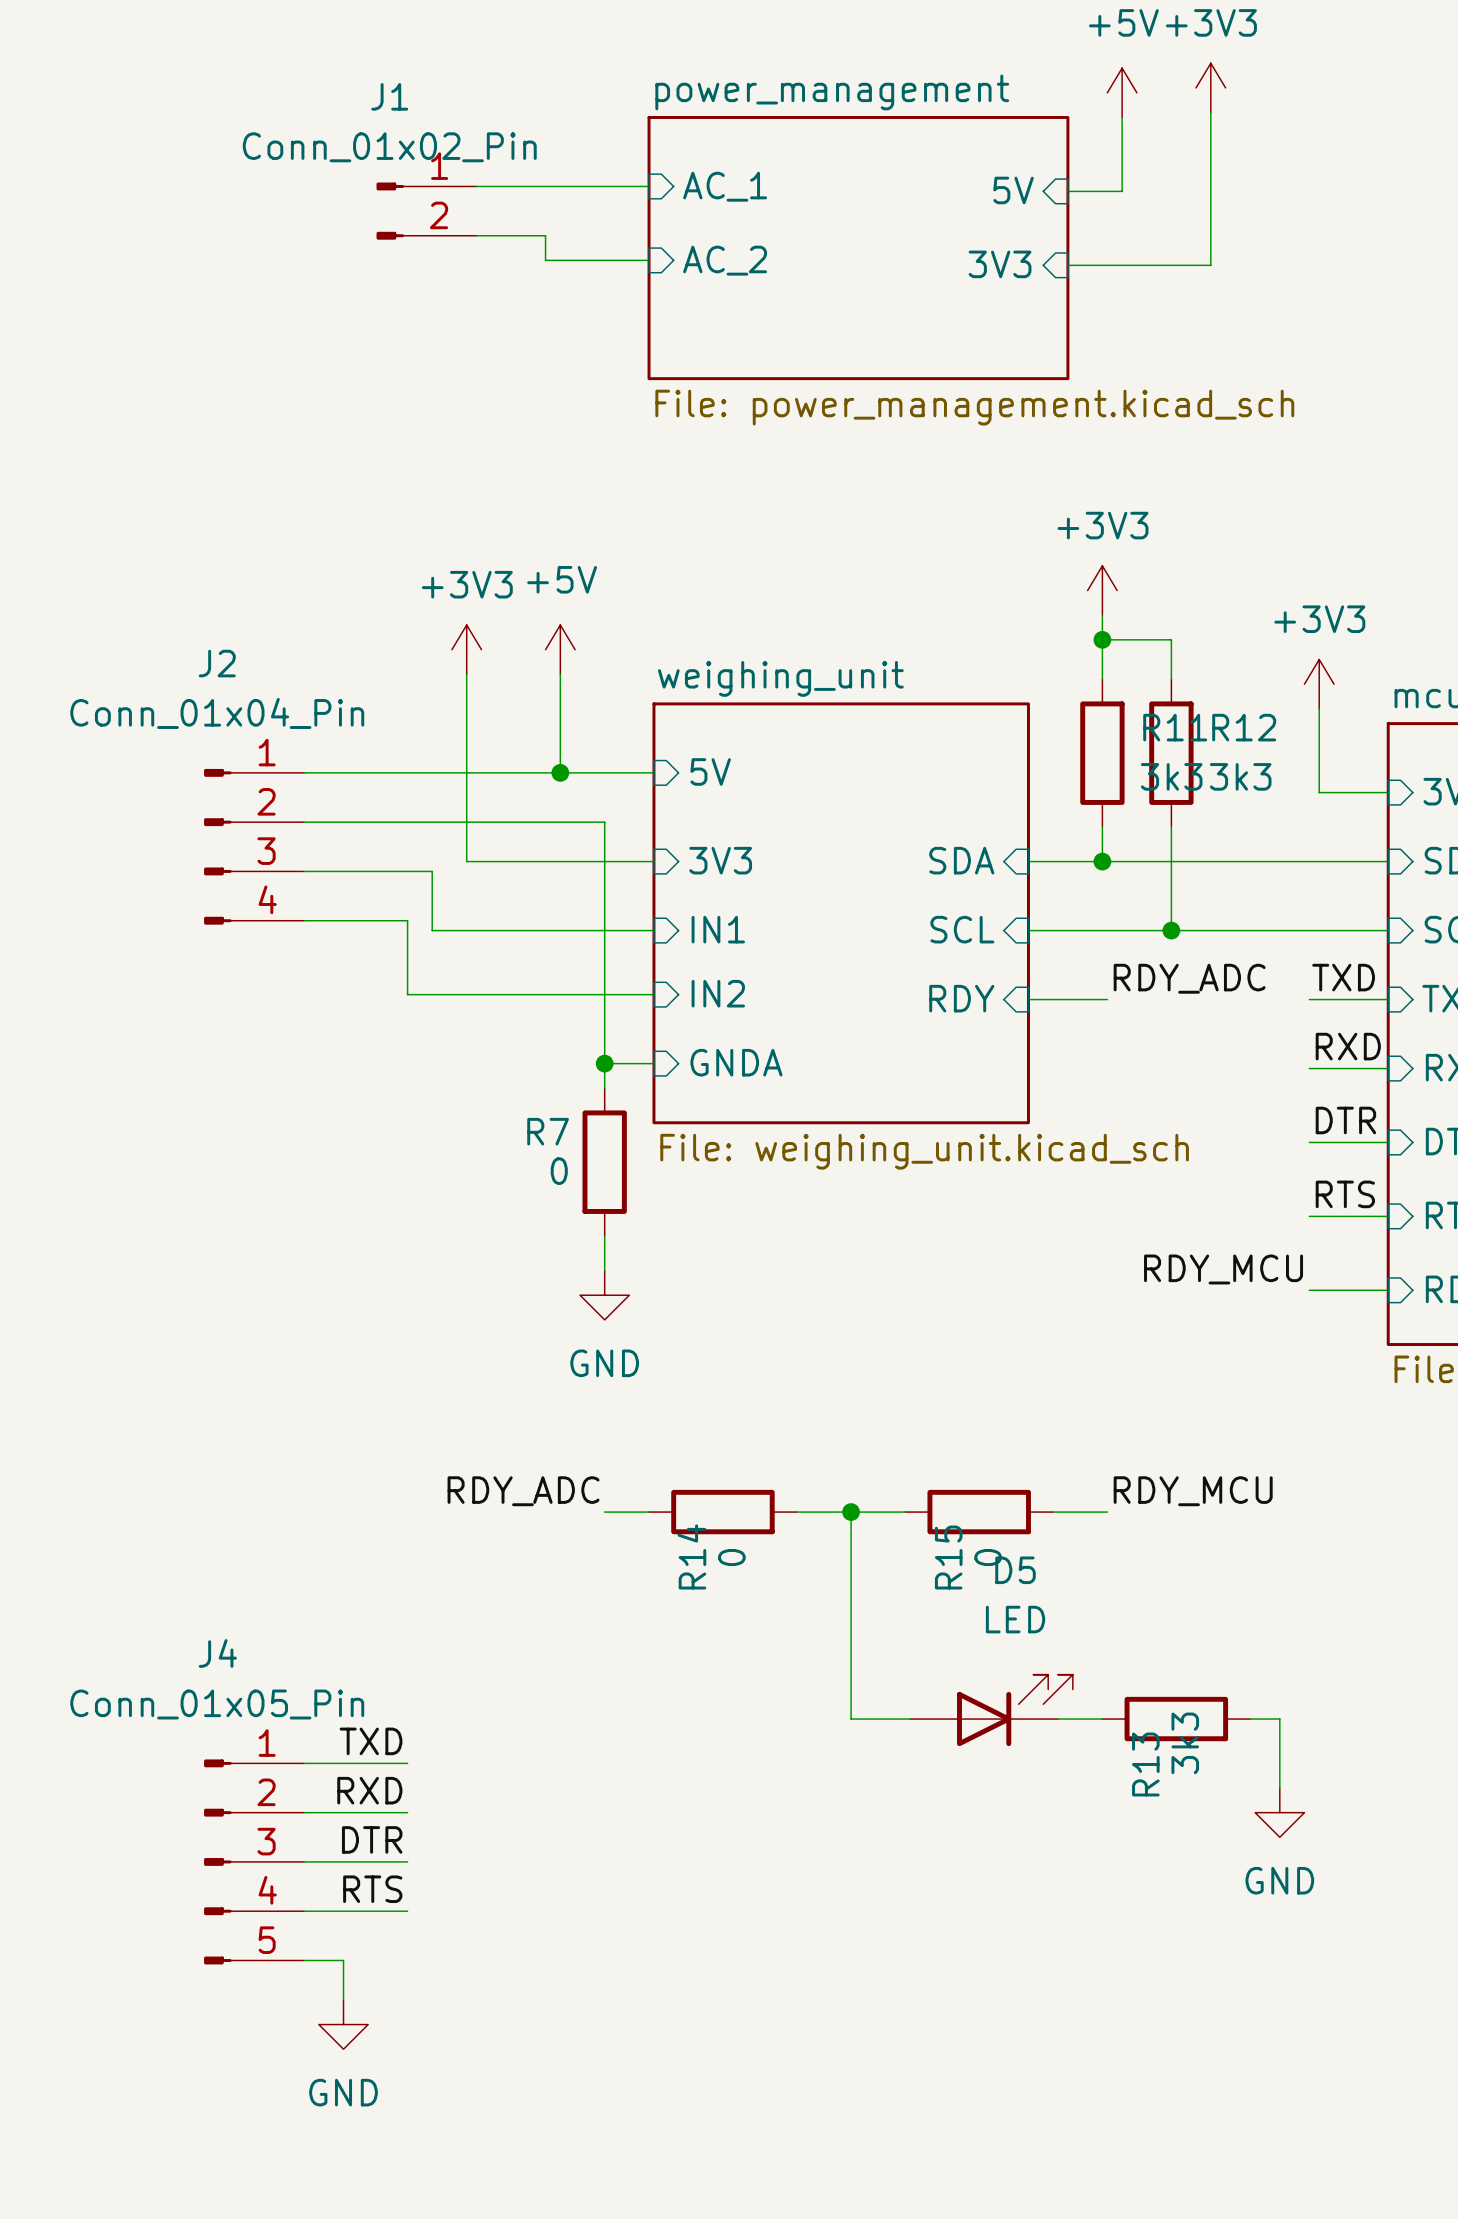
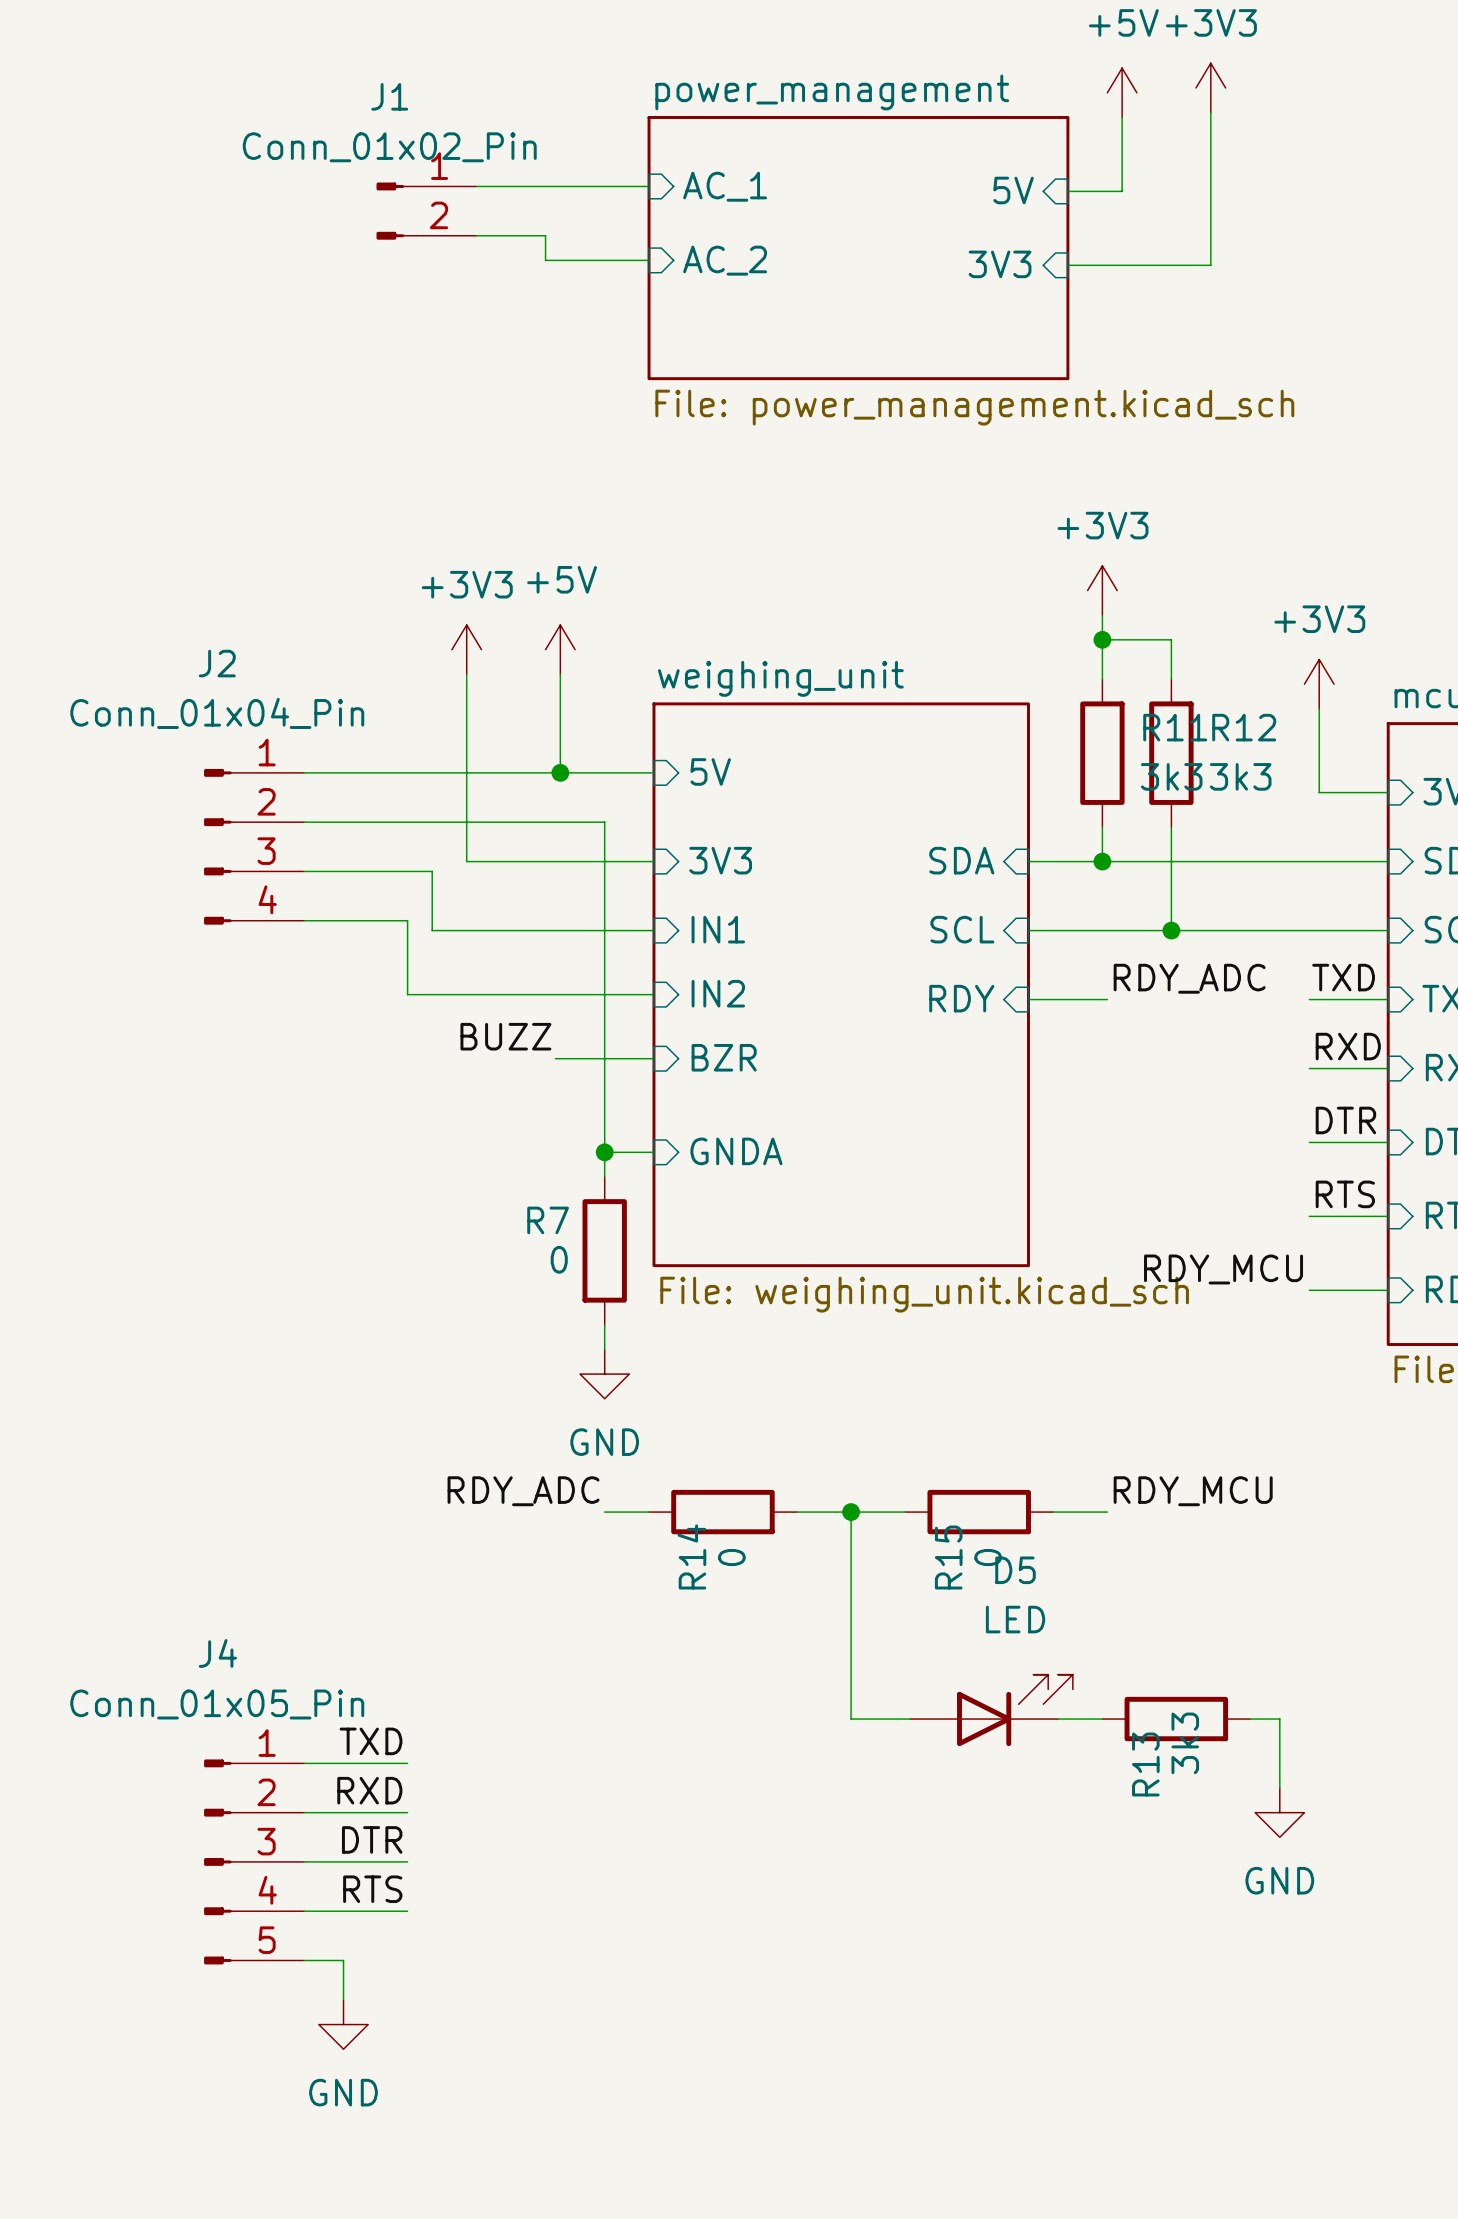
sheet weighing_unit: File: weighing_unit.kicad_sch (841, 913) -> none
sheet weighing_unit: none -> File: weighing_unit.kicad_sch (841, 984)
label: none -> BUZZ (505, 1036)
sheet pin: none -> BZR (724, 1057)
wire: none -> (555, 1058) (653, 1058)
sheet pin position: GNDA (736, 1062) -> GNDA (736, 1151)
wire: (604, 1063) (653, 1063) -> (604, 1152) (653, 1152)
junction position: (604, 1063) -> (604, 1152)
wire: none -> (604, 1088) (604, 1176)
R7 position: (604, 1162) -> (604, 1250)
wire: (604, 1236) (604, 1270) -> none
power symbol position: GND (604, 1295) -> GND (604, 1374)
wire: none -> (604, 1324) (604, 1349)

